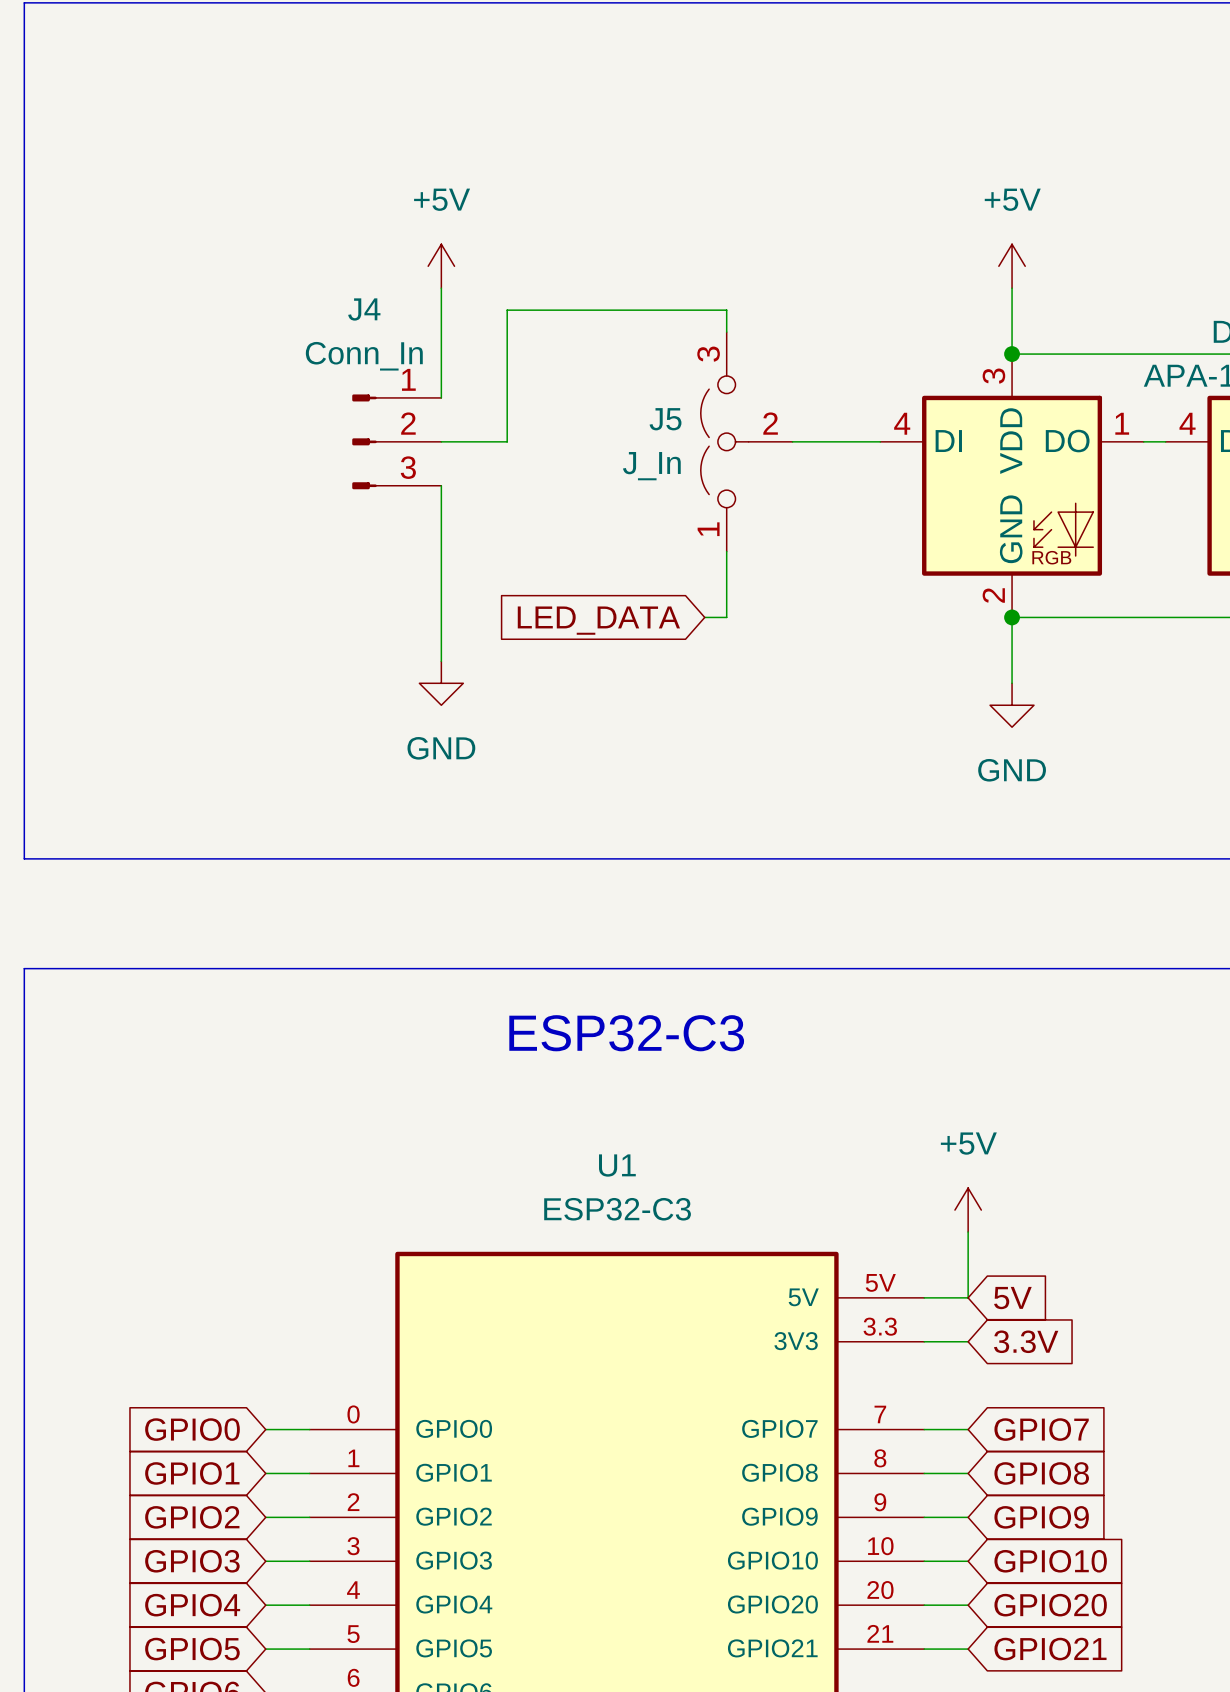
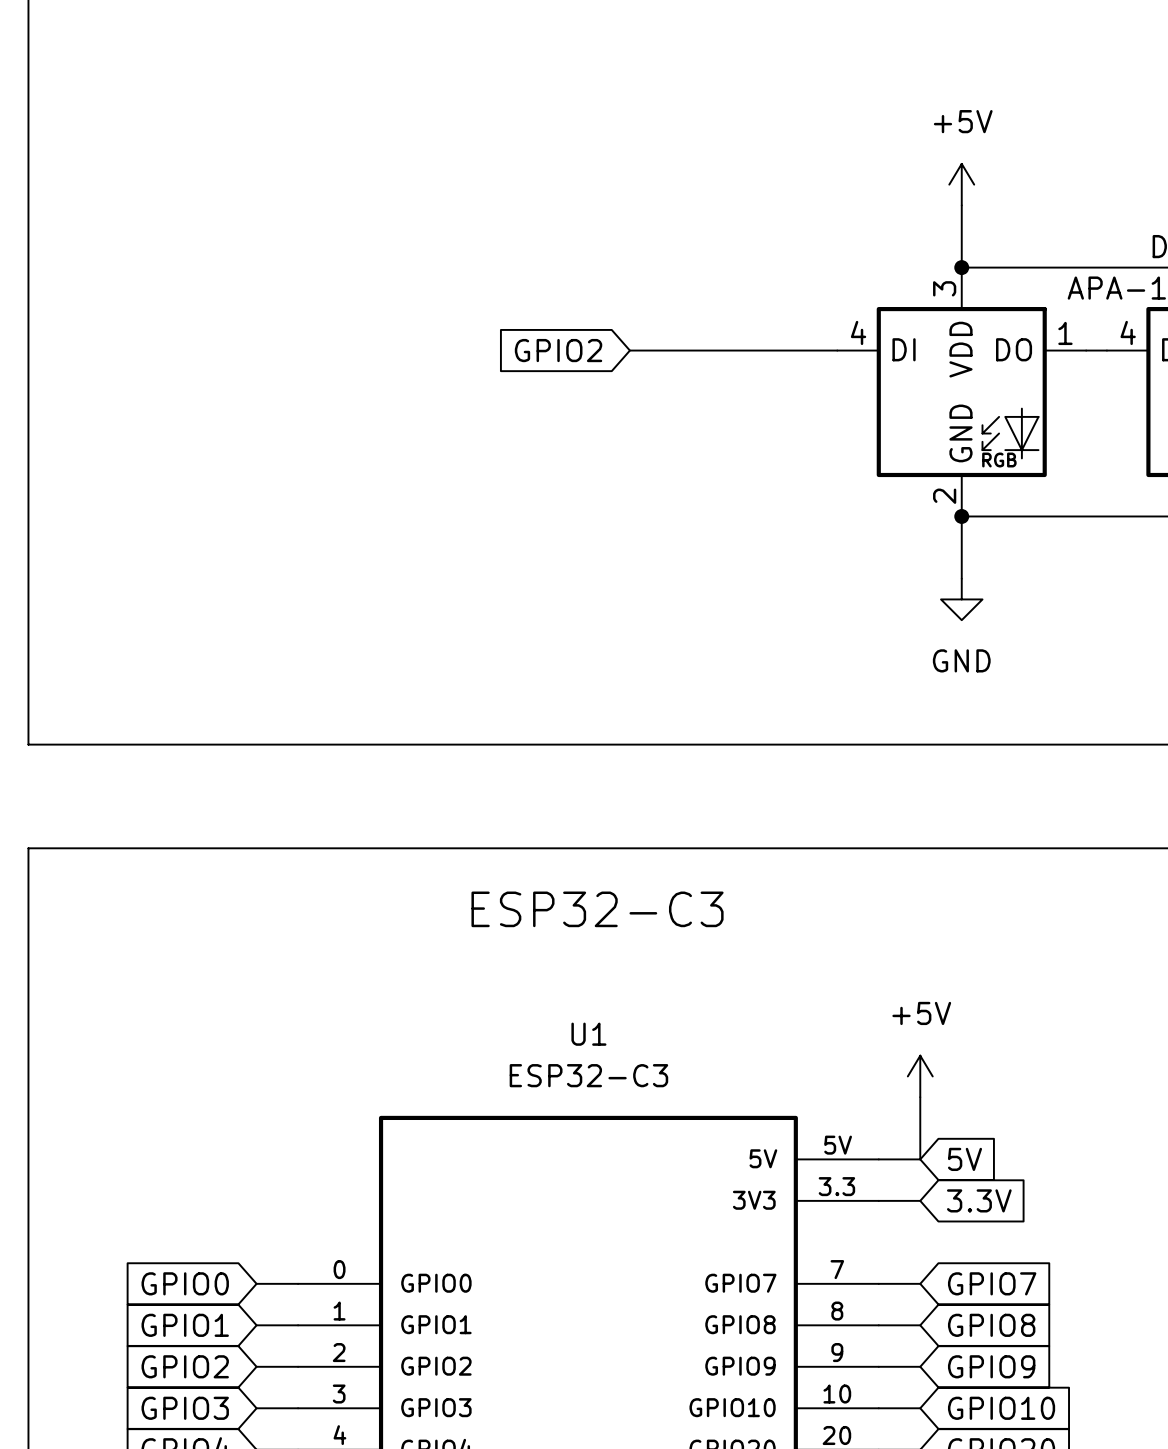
power symbol: +5V (441, 266) -> none
wire: (441, 288) (441, 397) -> none
wire: (726, 332) (726, 310) (507, 310) (507, 441) (441, 441) -> none
J4: Conn_In (396, 441) -> none
global label: none -> GPIO2 (558, 350)
wire: none -> (629, 350) (754, 350)
J5: J_In (746, 441) -> none
wire: (441, 485) (441, 661) -> none
wire: (726, 551) (726, 617) (704, 617) -> none
global label: LED_DATA (598, 620) -> none
power symbol: GND (441, 683) -> none

